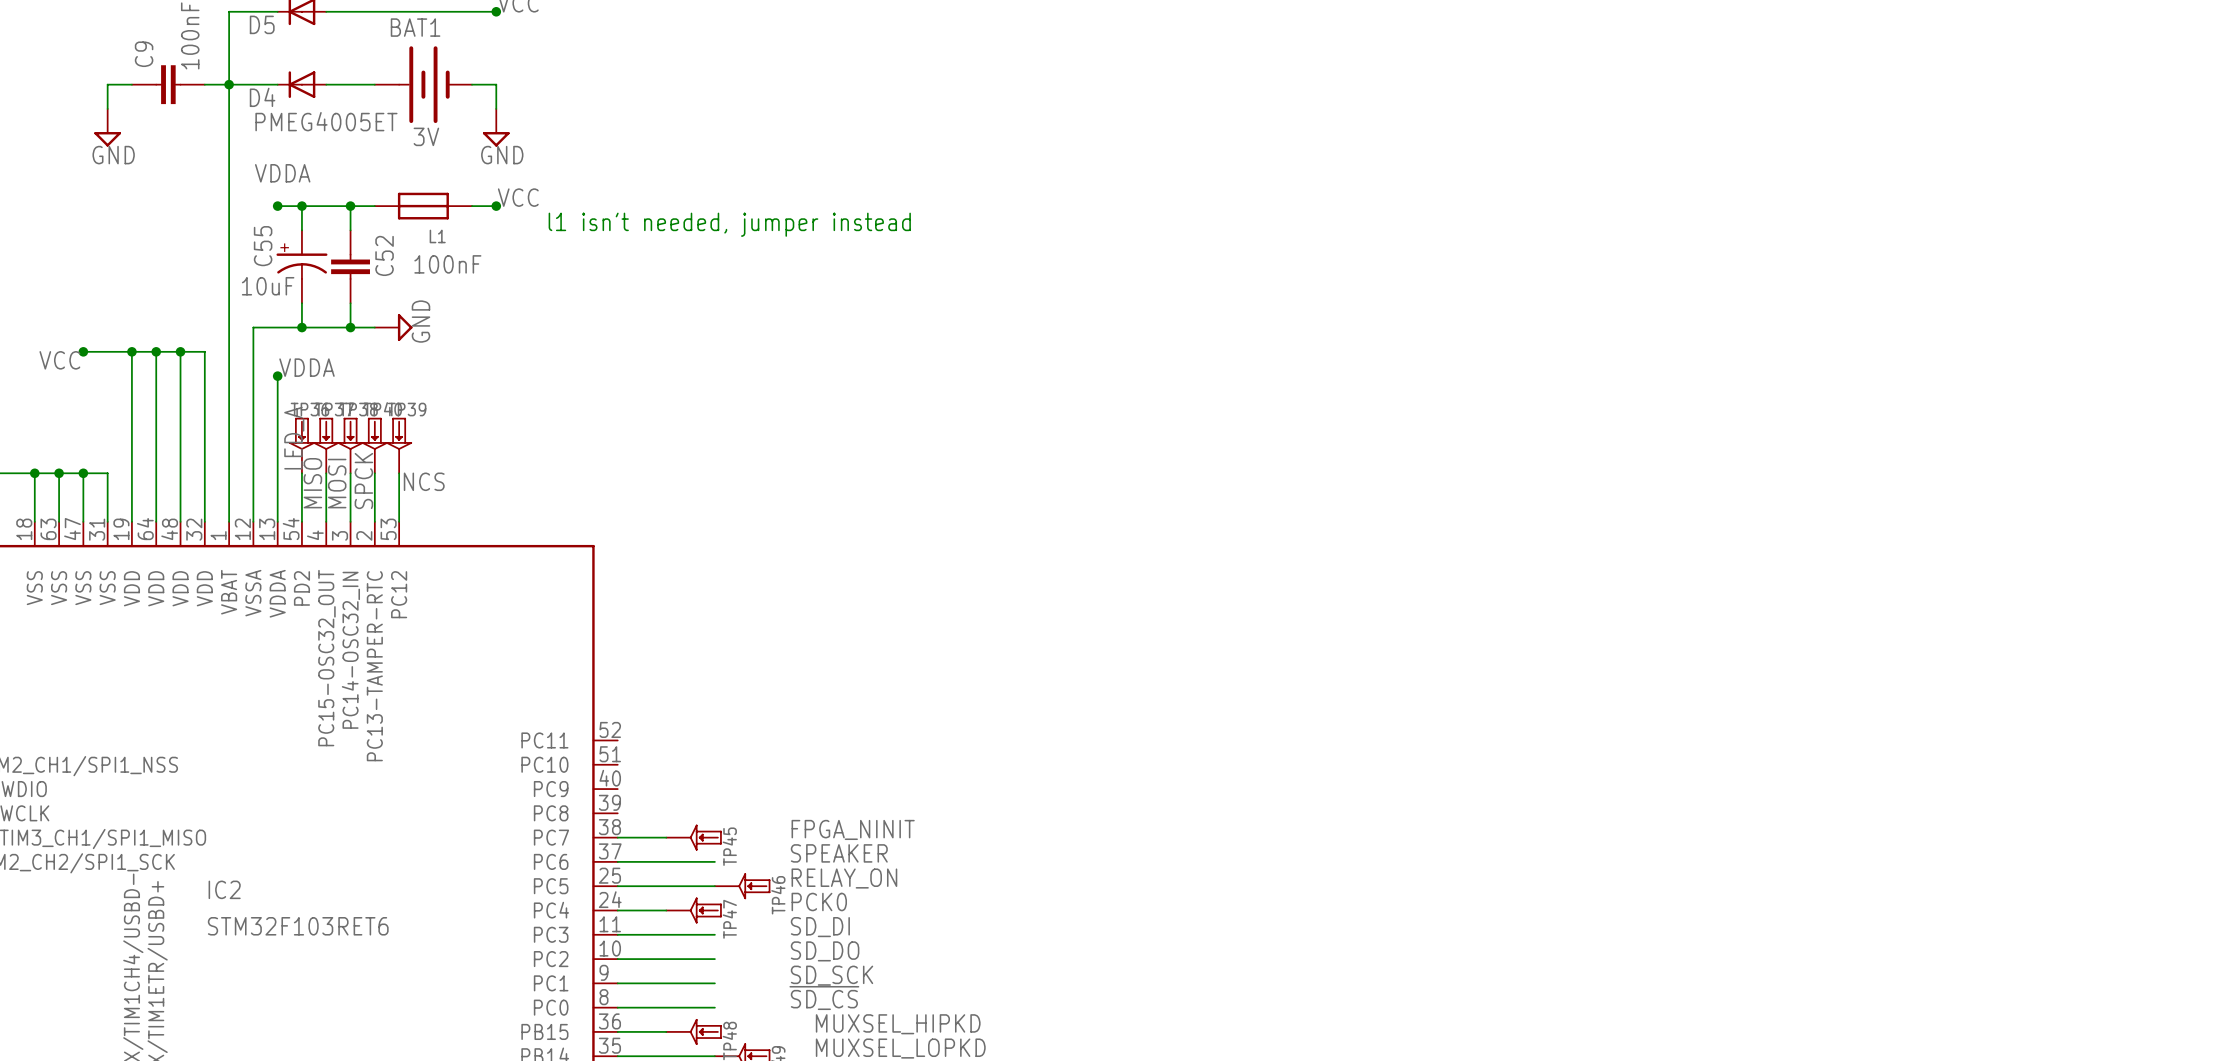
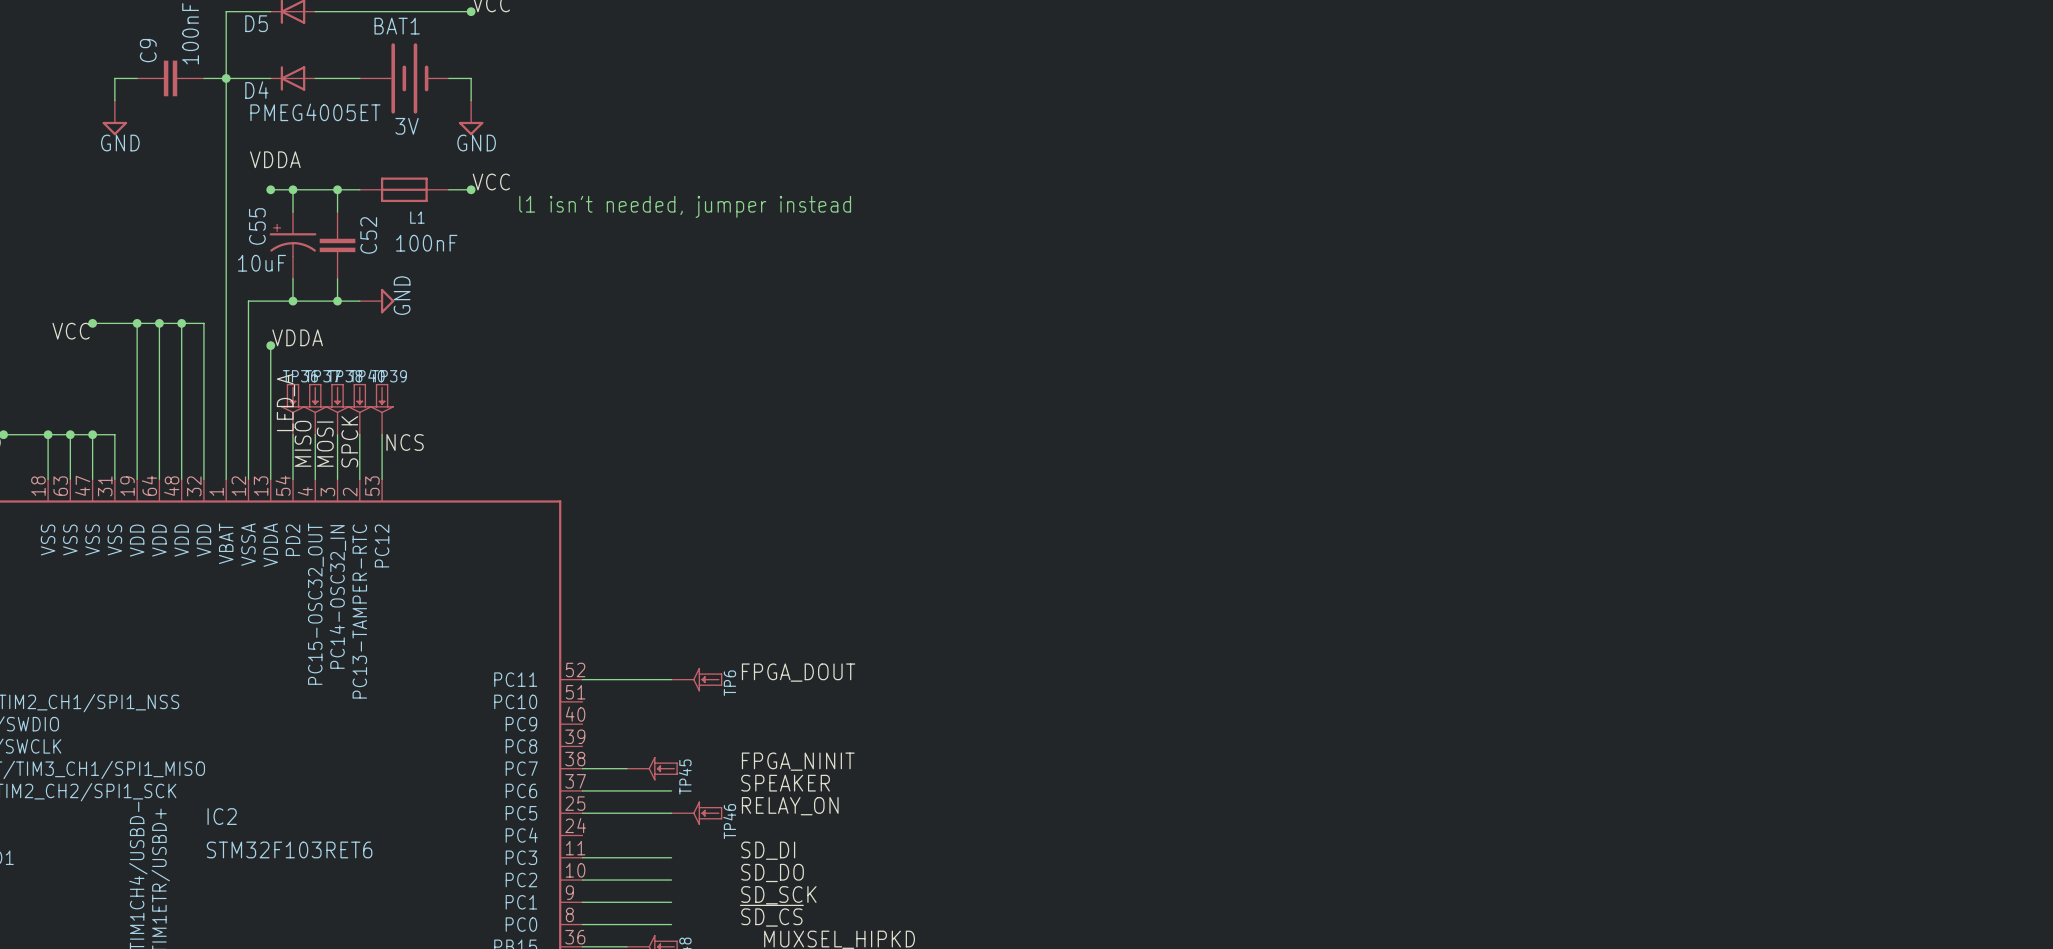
label: none -> FPGA_DOUT (798, 672)
wire: none -> (582, 679) (671, 679)
TP6: none -> (696, 679)
label: PCK0 (819, 901) -> none
wire: (617, 910) (666, 910) -> none
TP47: (694, 910) -> none

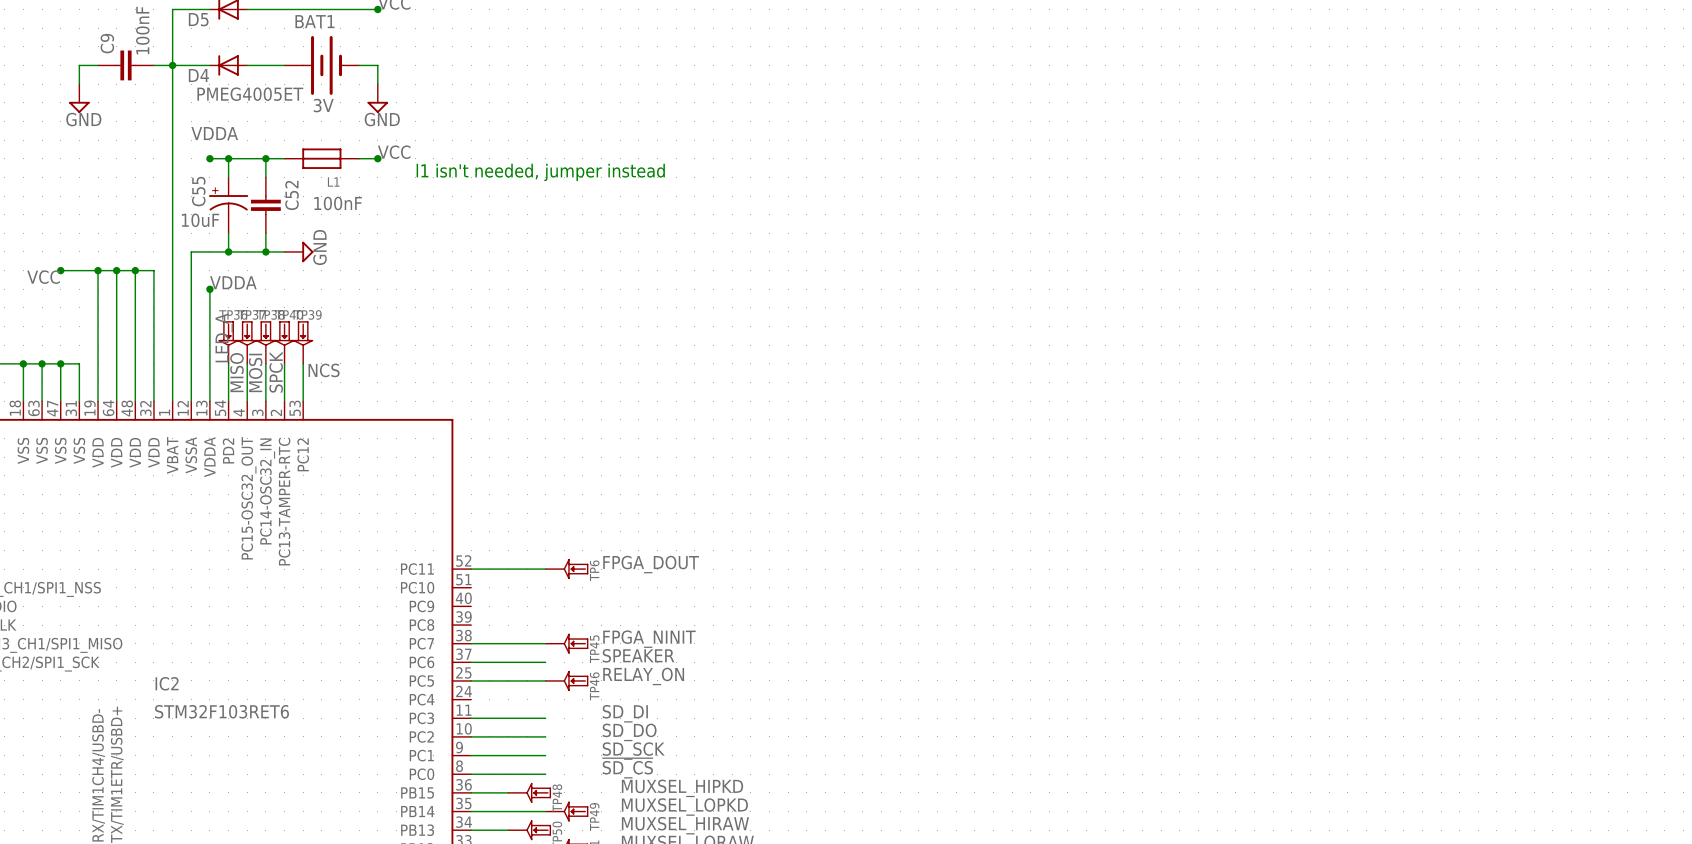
TP45 position: (652, 768) -> (566, 643)

